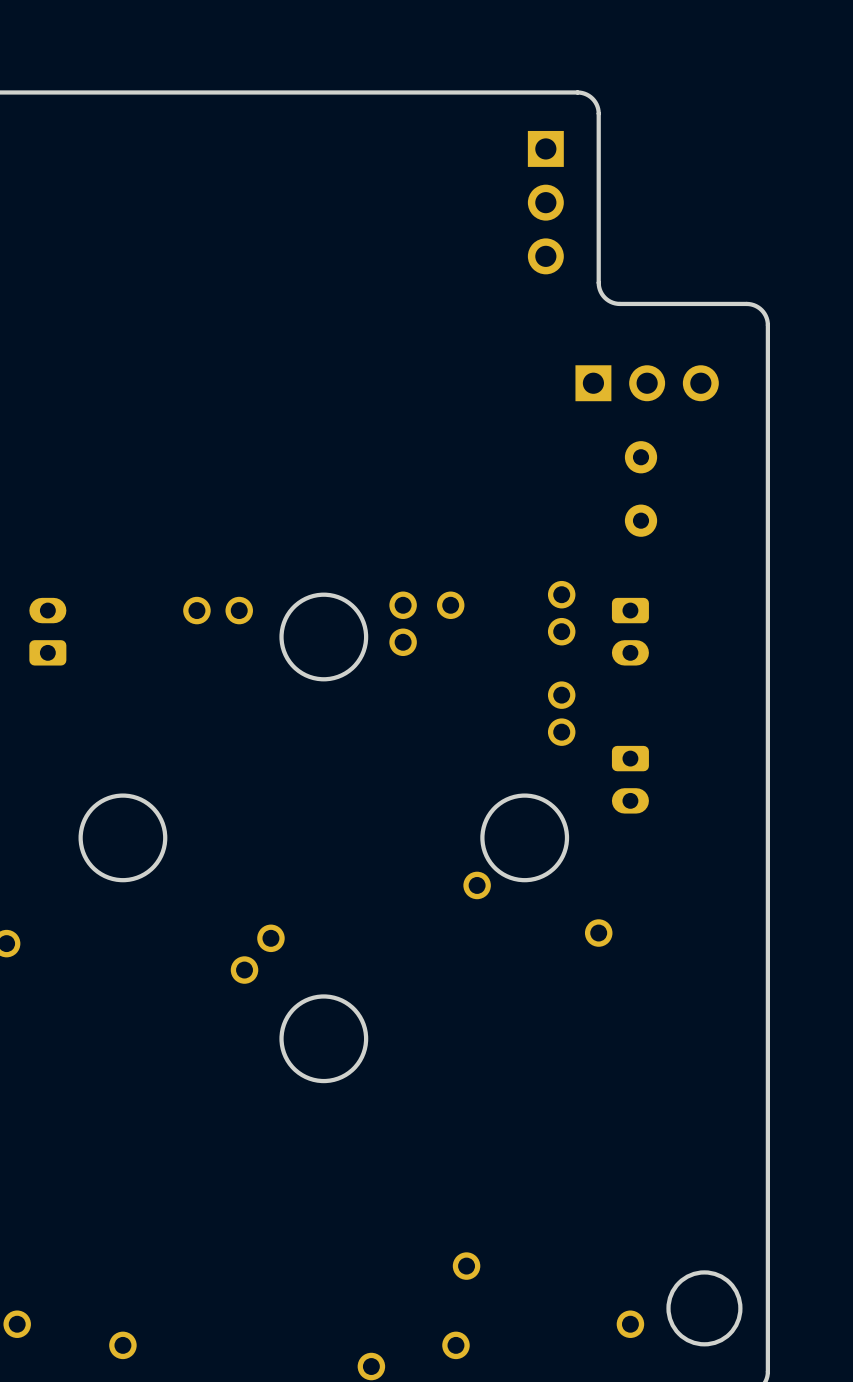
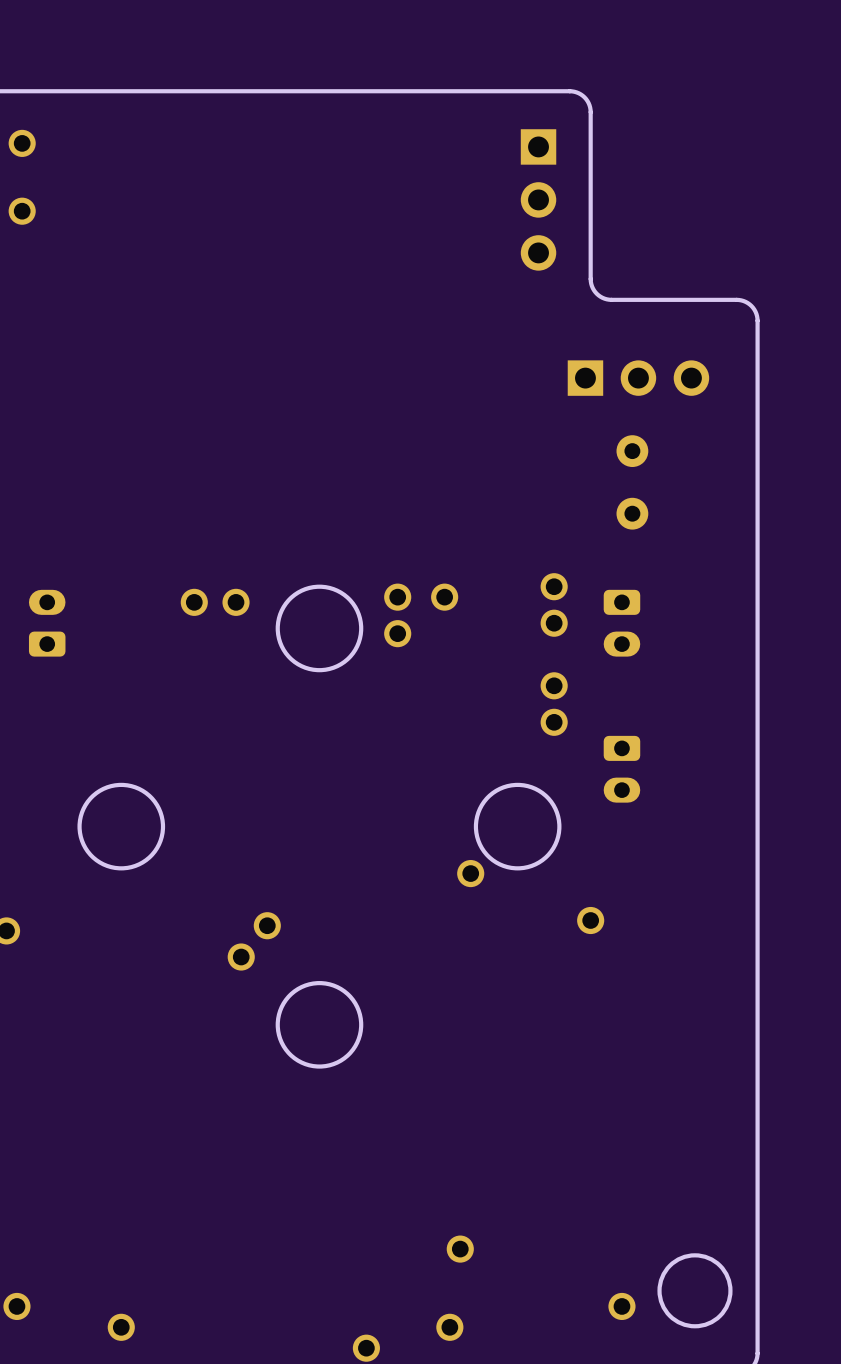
part: none -> (22, 143)
part: none -> (22, 211)

